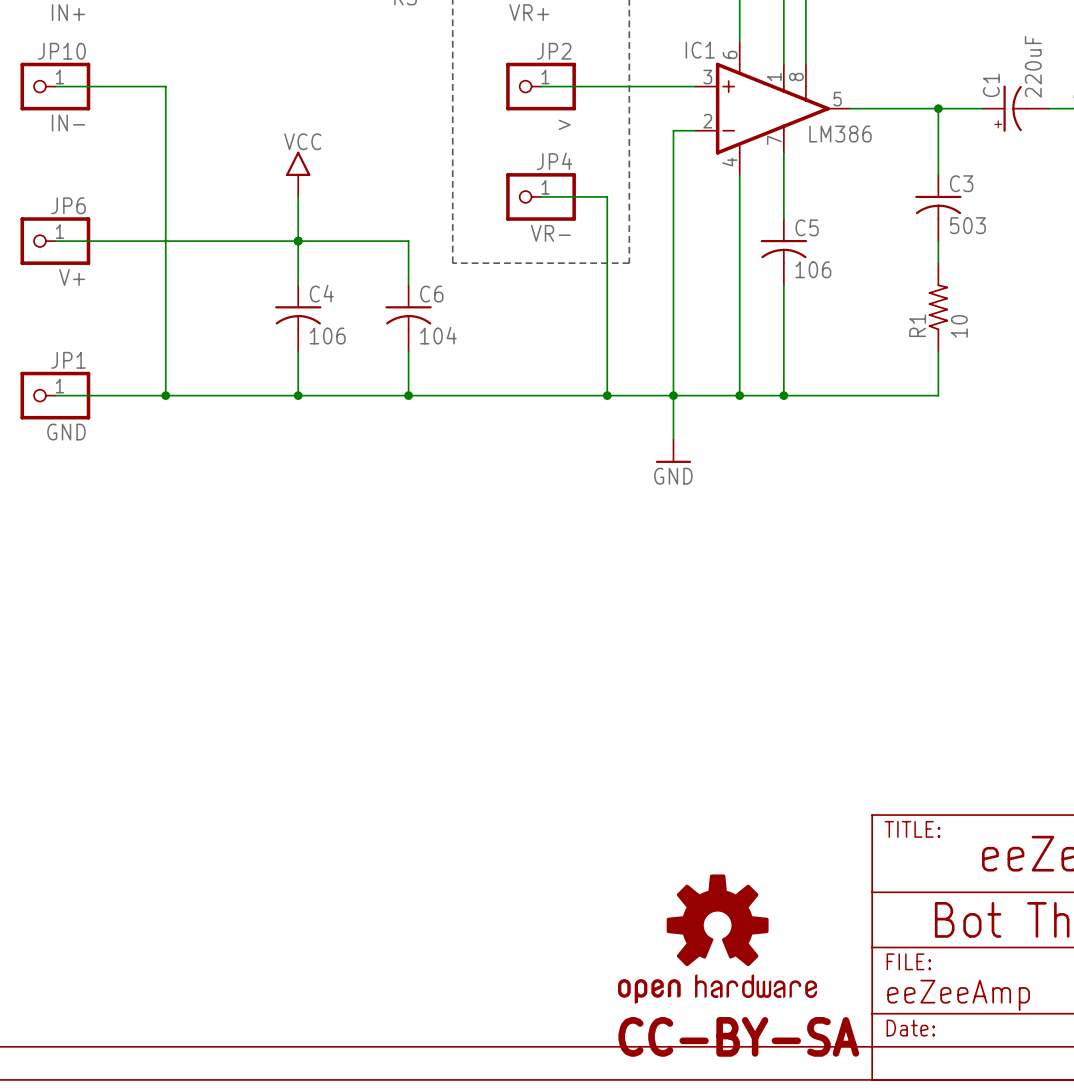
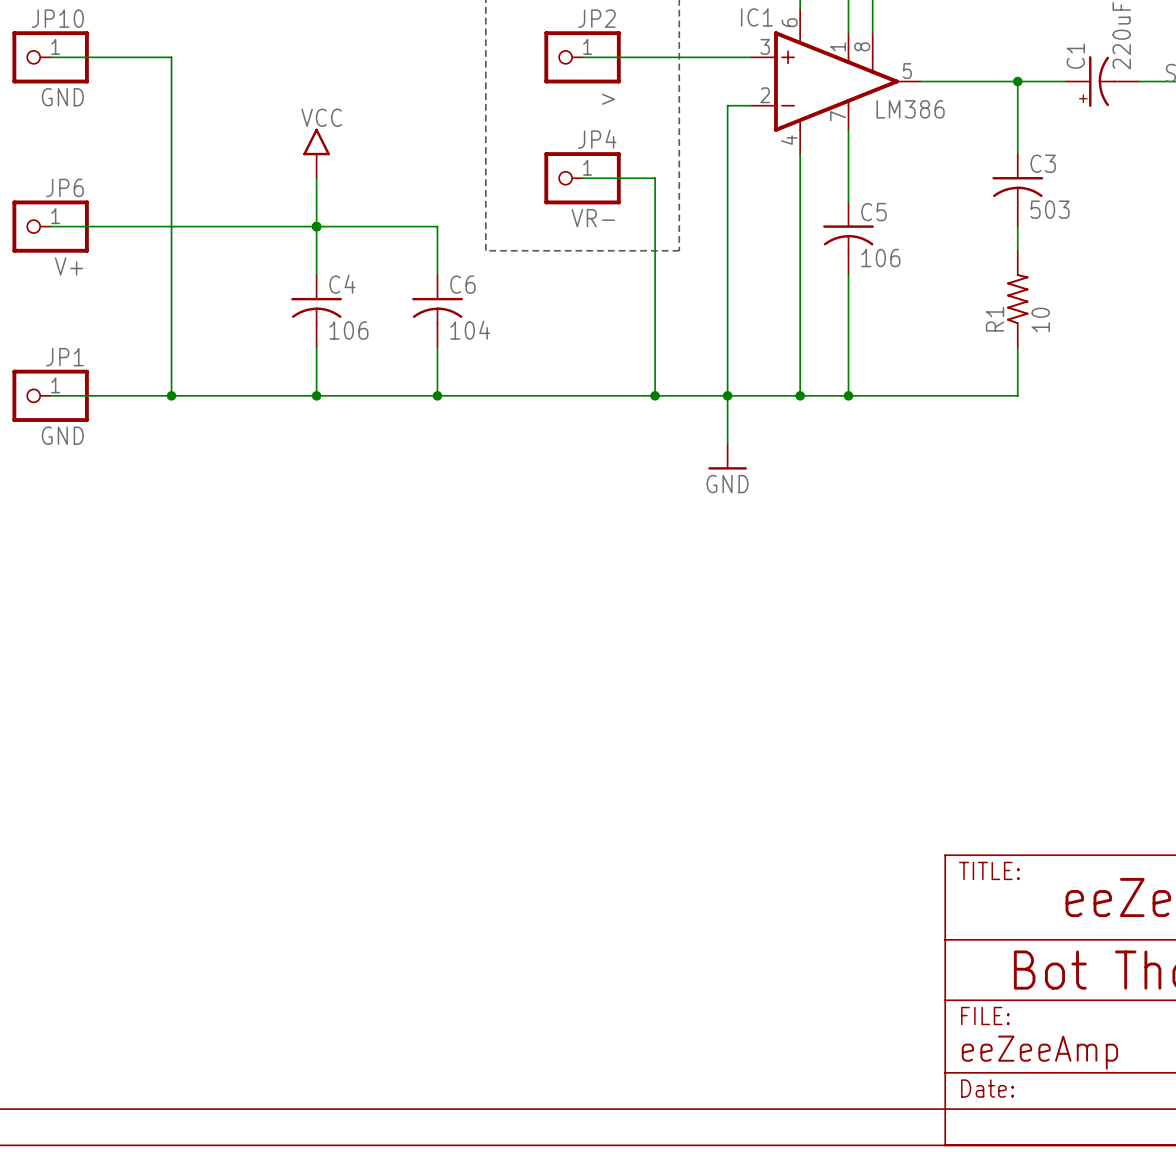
JP10 value: IN- (68, 123) -> GND (62, 97)
part: (717, 939) -> none
text: CC-BY-SA (738, 1036) -> none

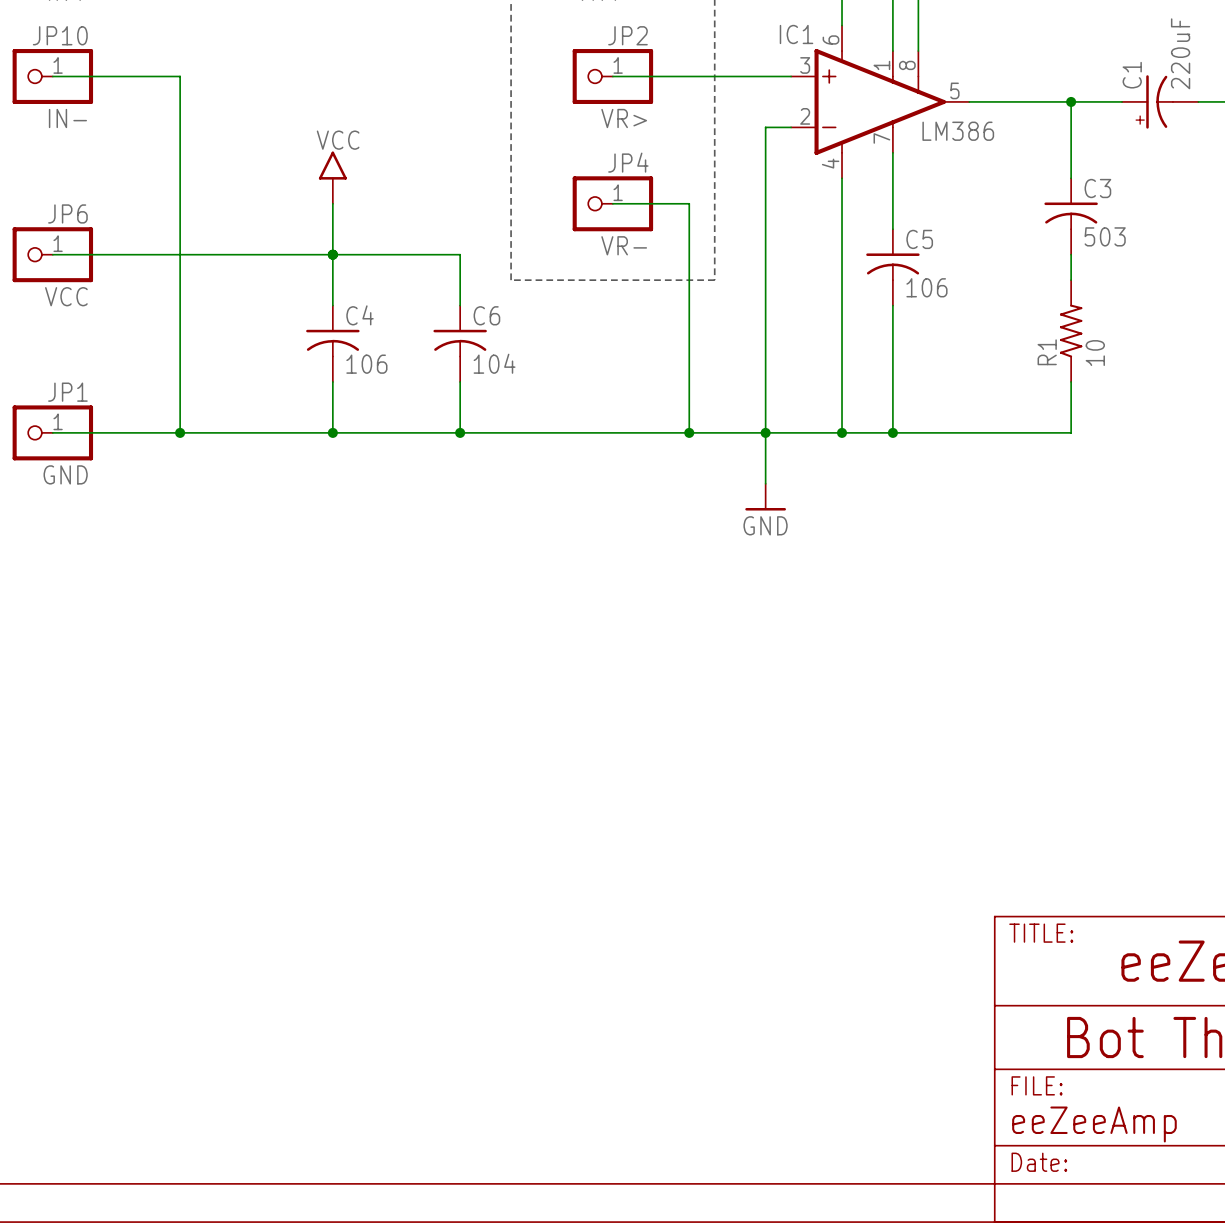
JP10 value: GND (62, 97) -> IN- (67, 118)
JP2 value: > (608, 99) -> VR> (624, 118)
JP6 value: V+ (68, 266) -> VCC (66, 296)

